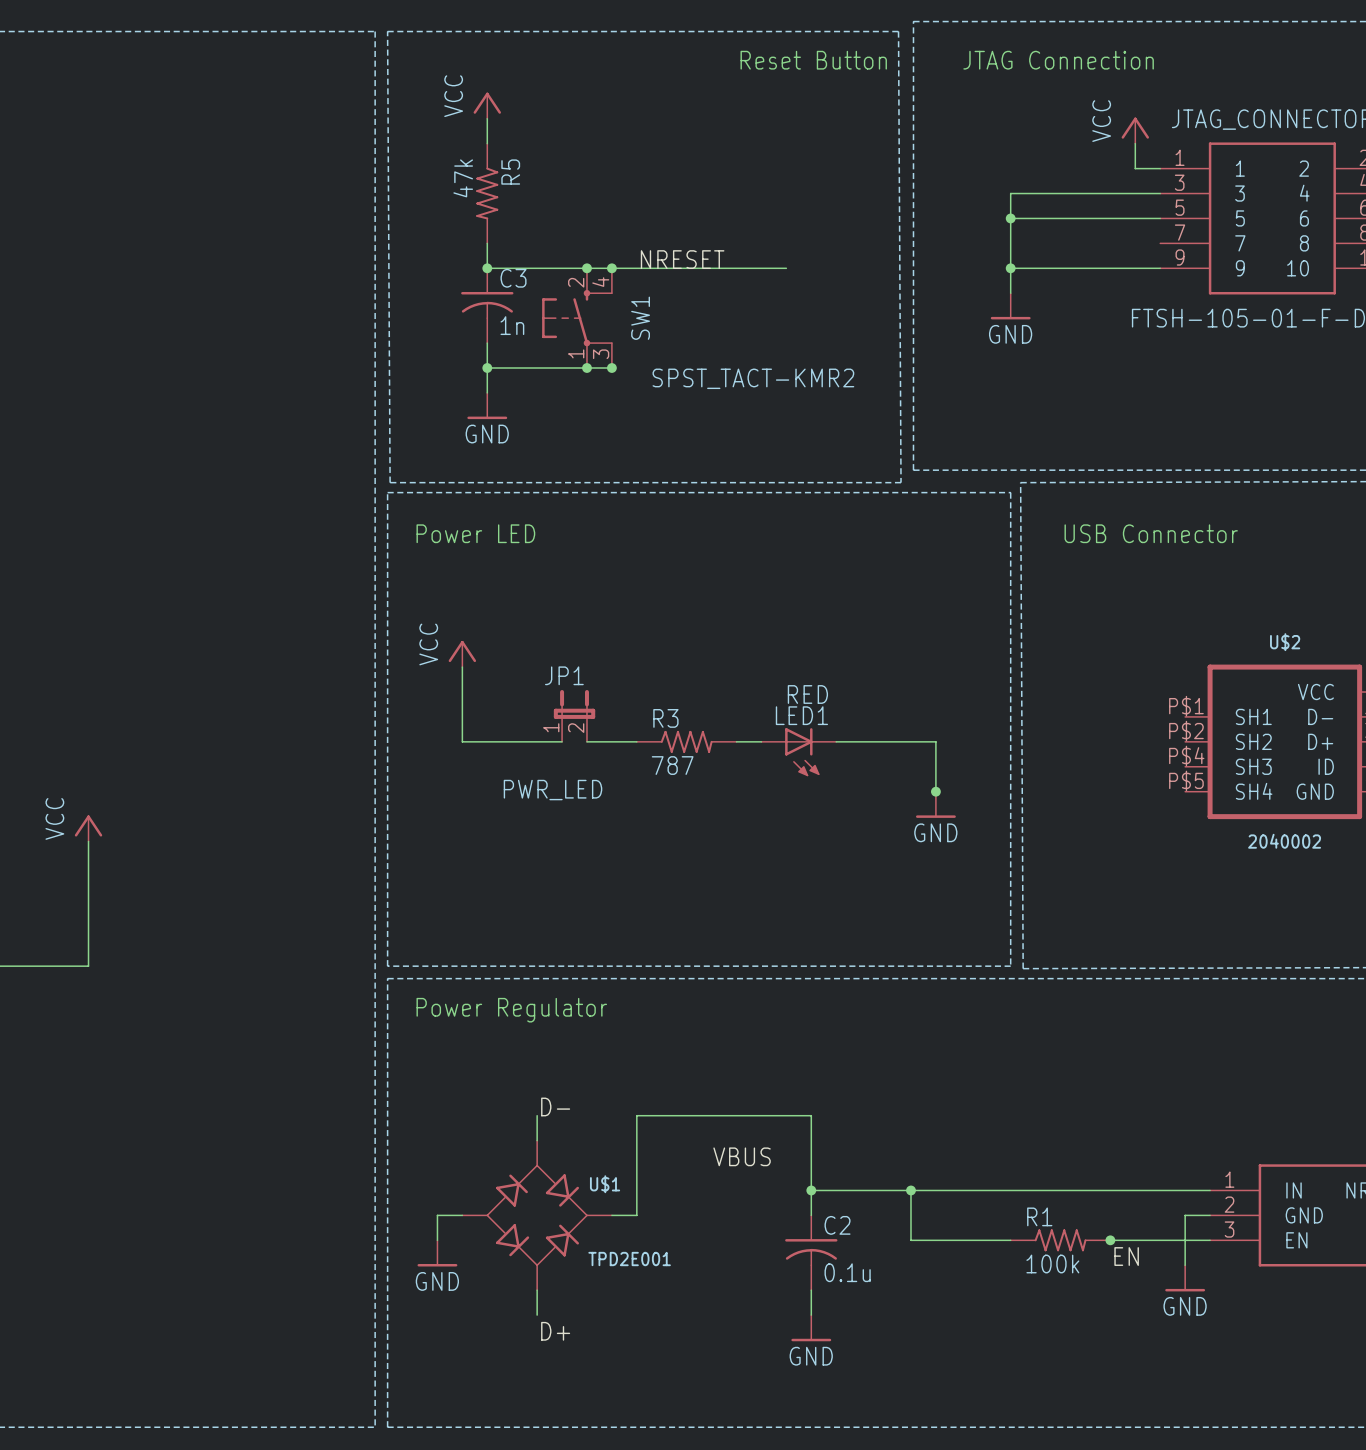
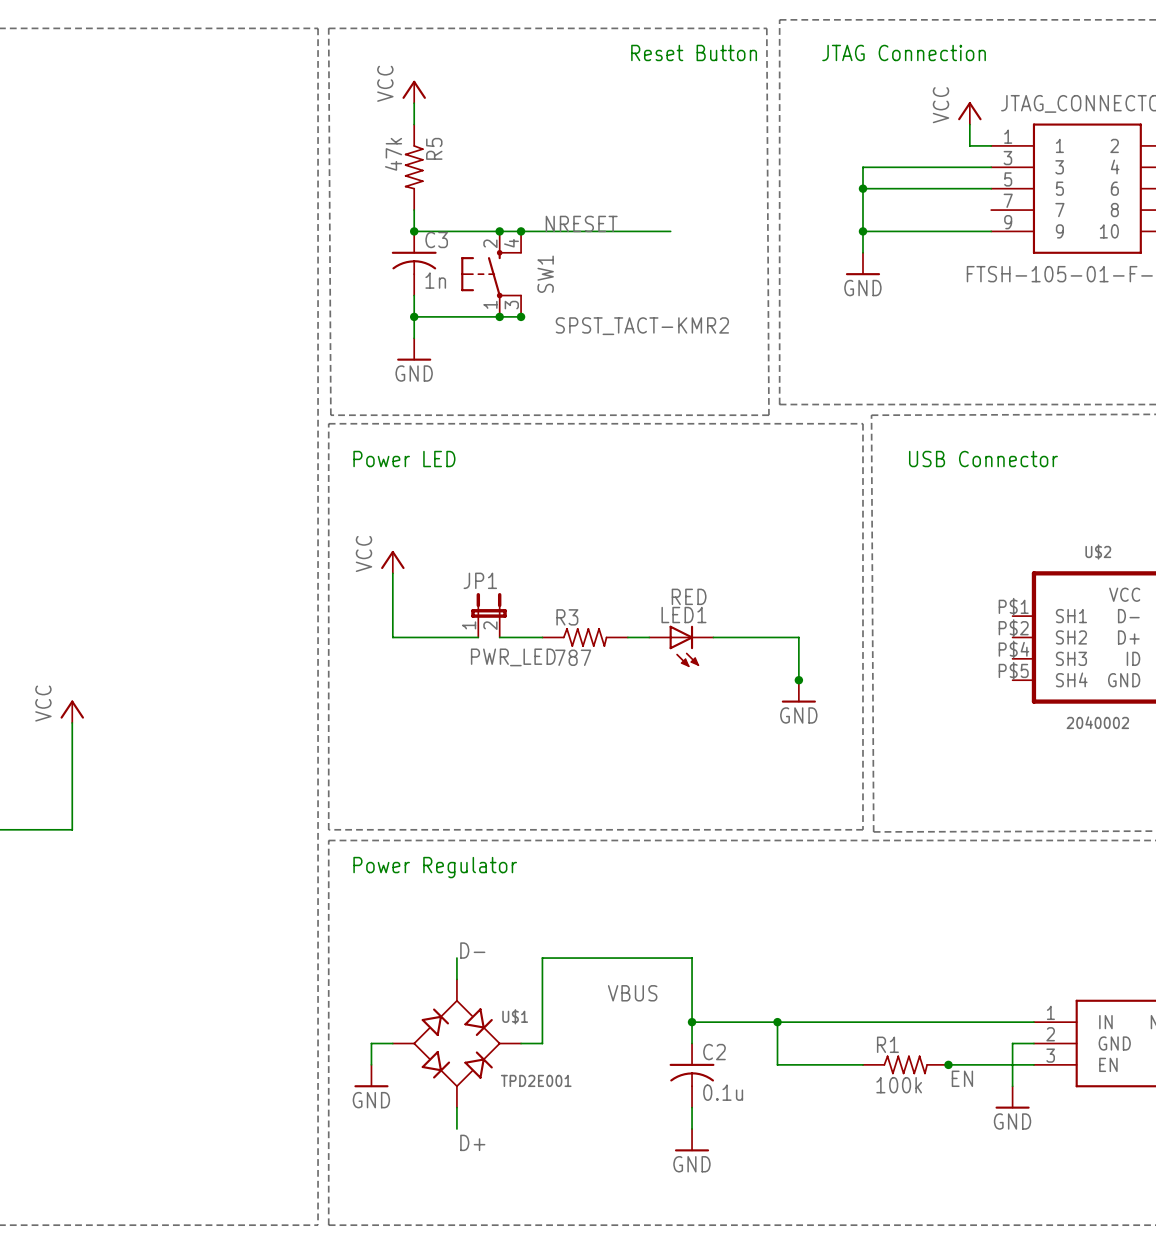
JP1 value position: PWR_LED (553, 790) -> PWR_LED (513, 657)

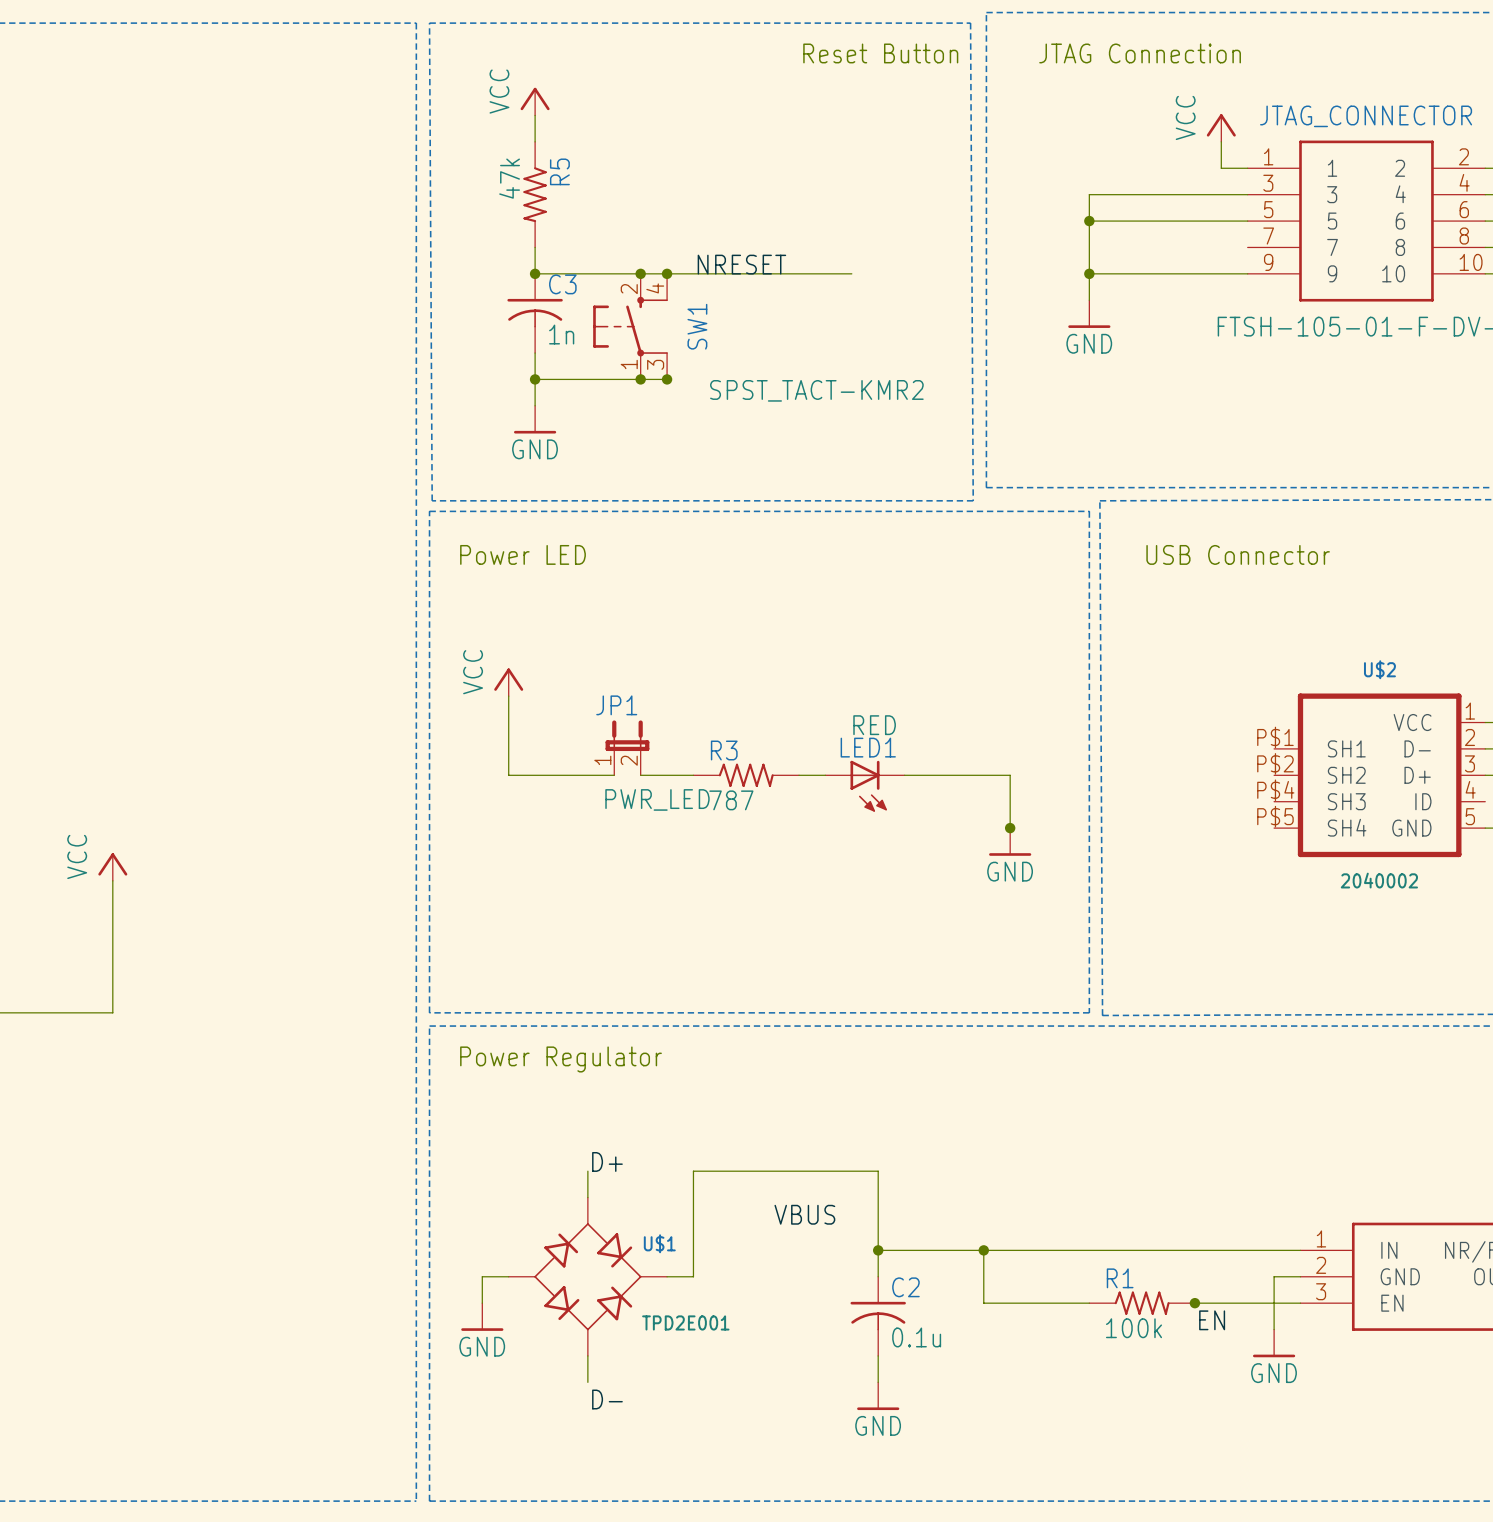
label: D- (472, 950) -> D+ (607, 1161)
label: D+ (472, 1142) -> D- (607, 1399)

